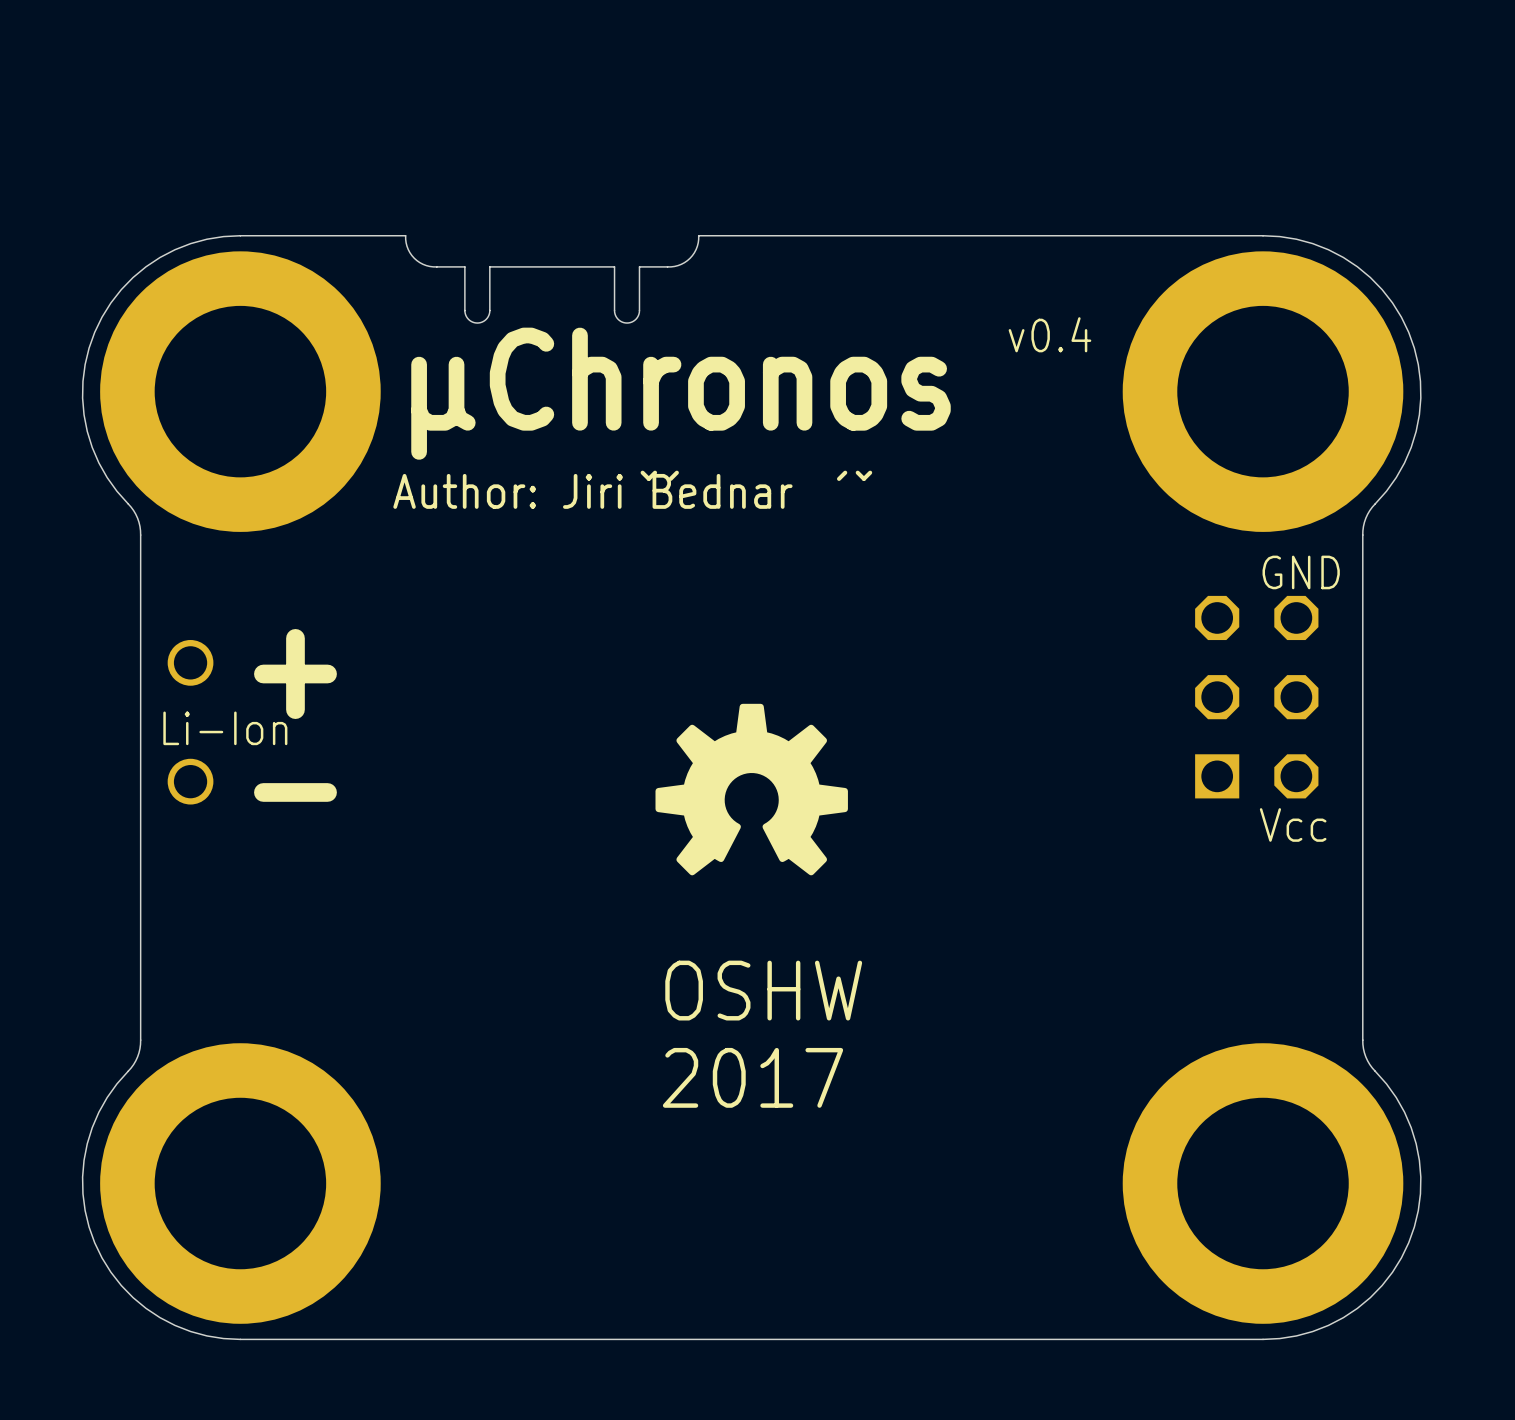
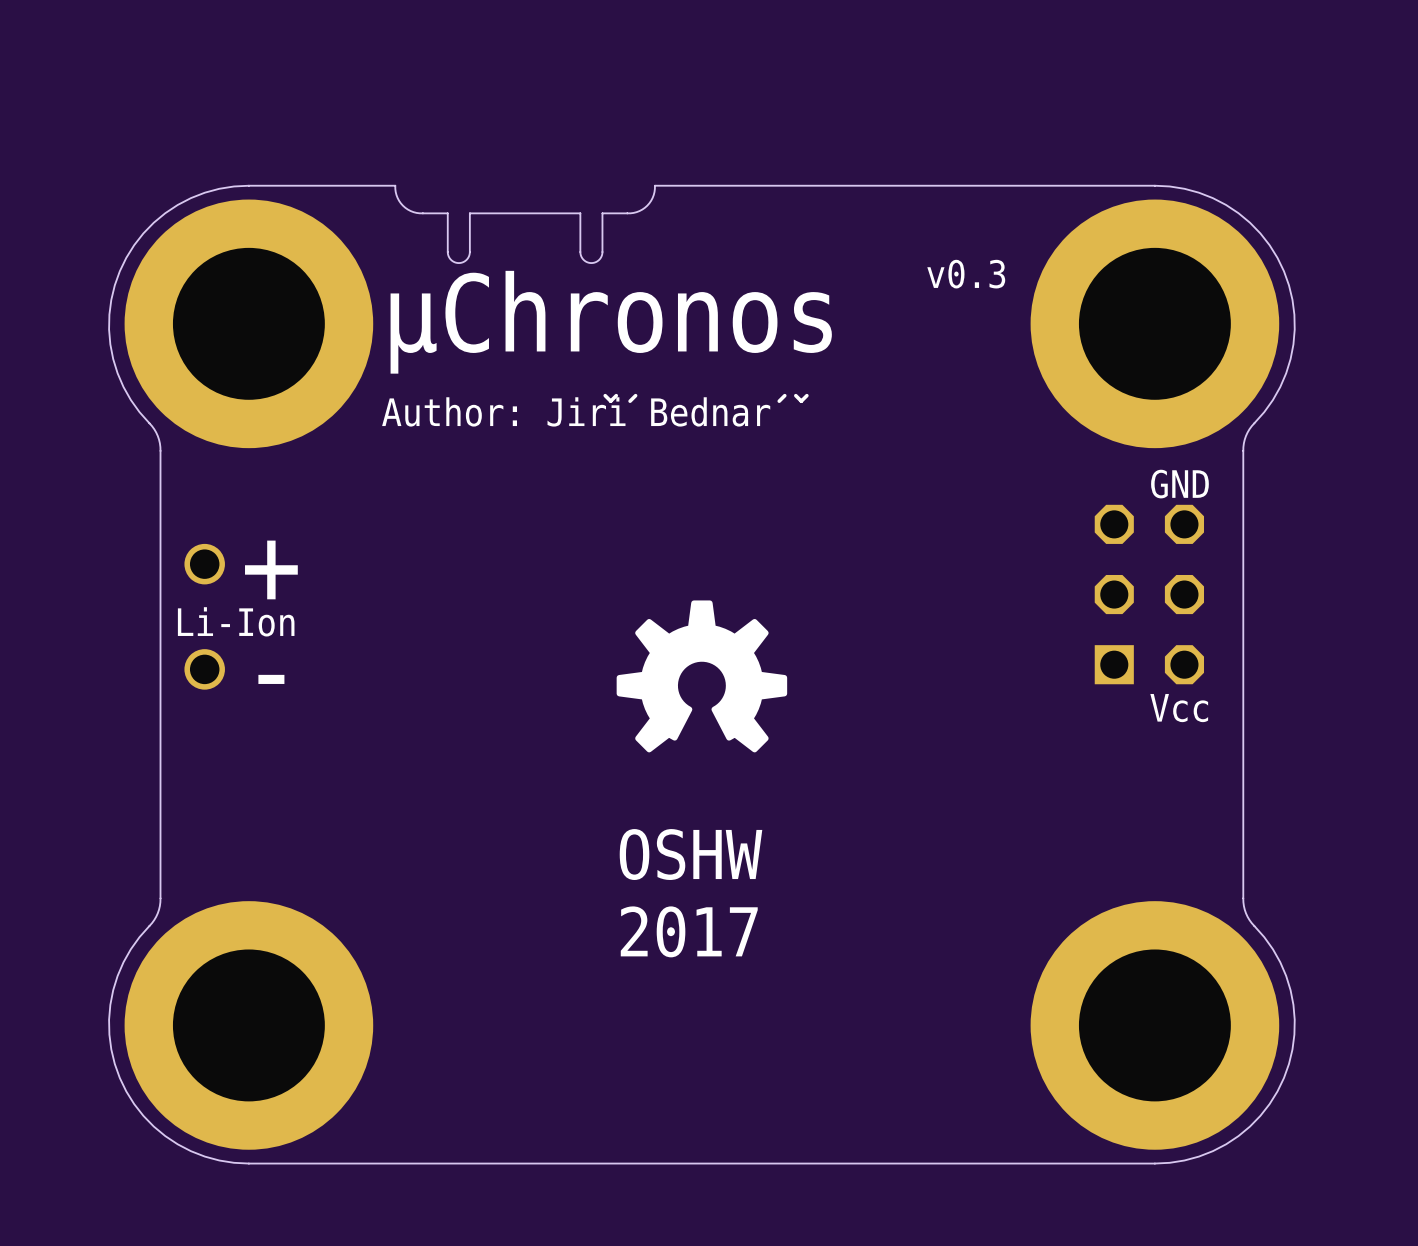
text: v0.4 (1049, 334) -> v0.3 (966, 274)

